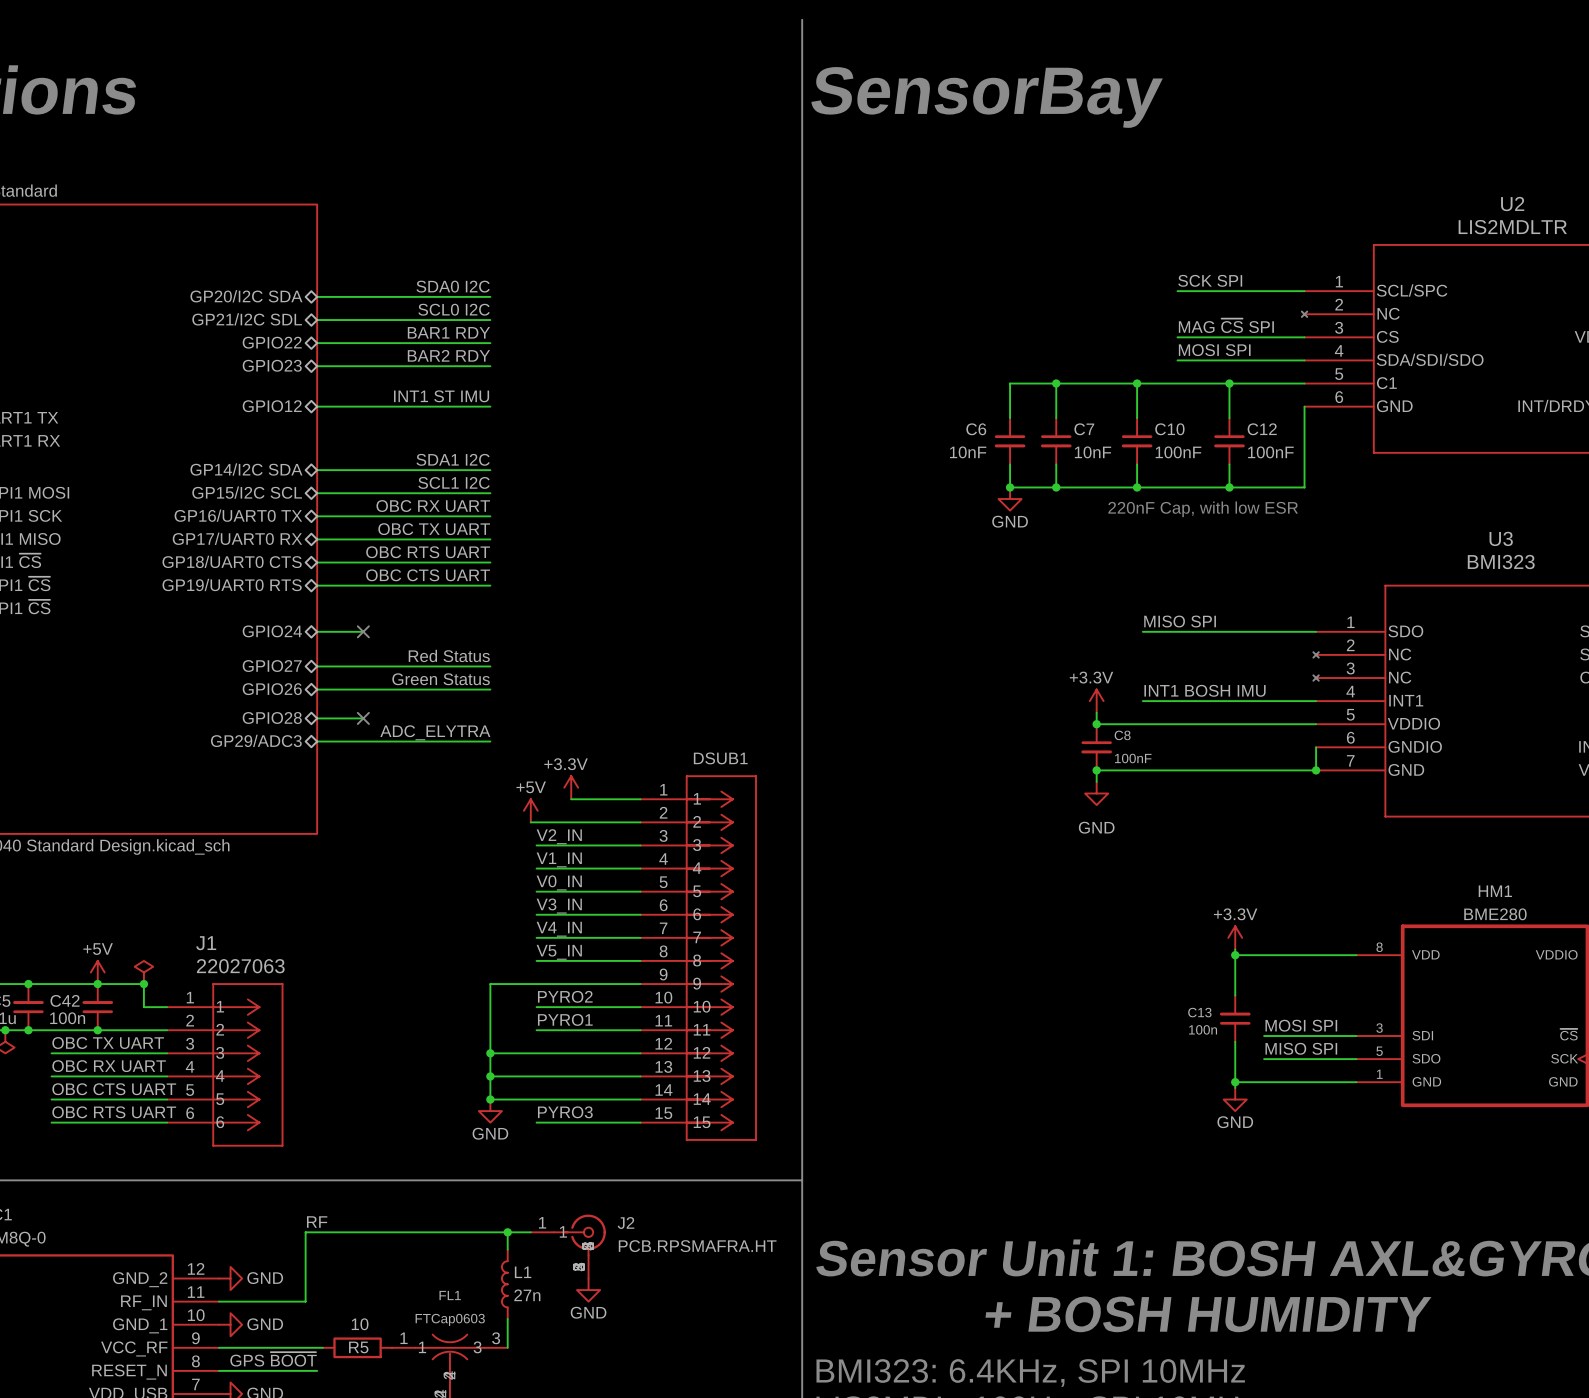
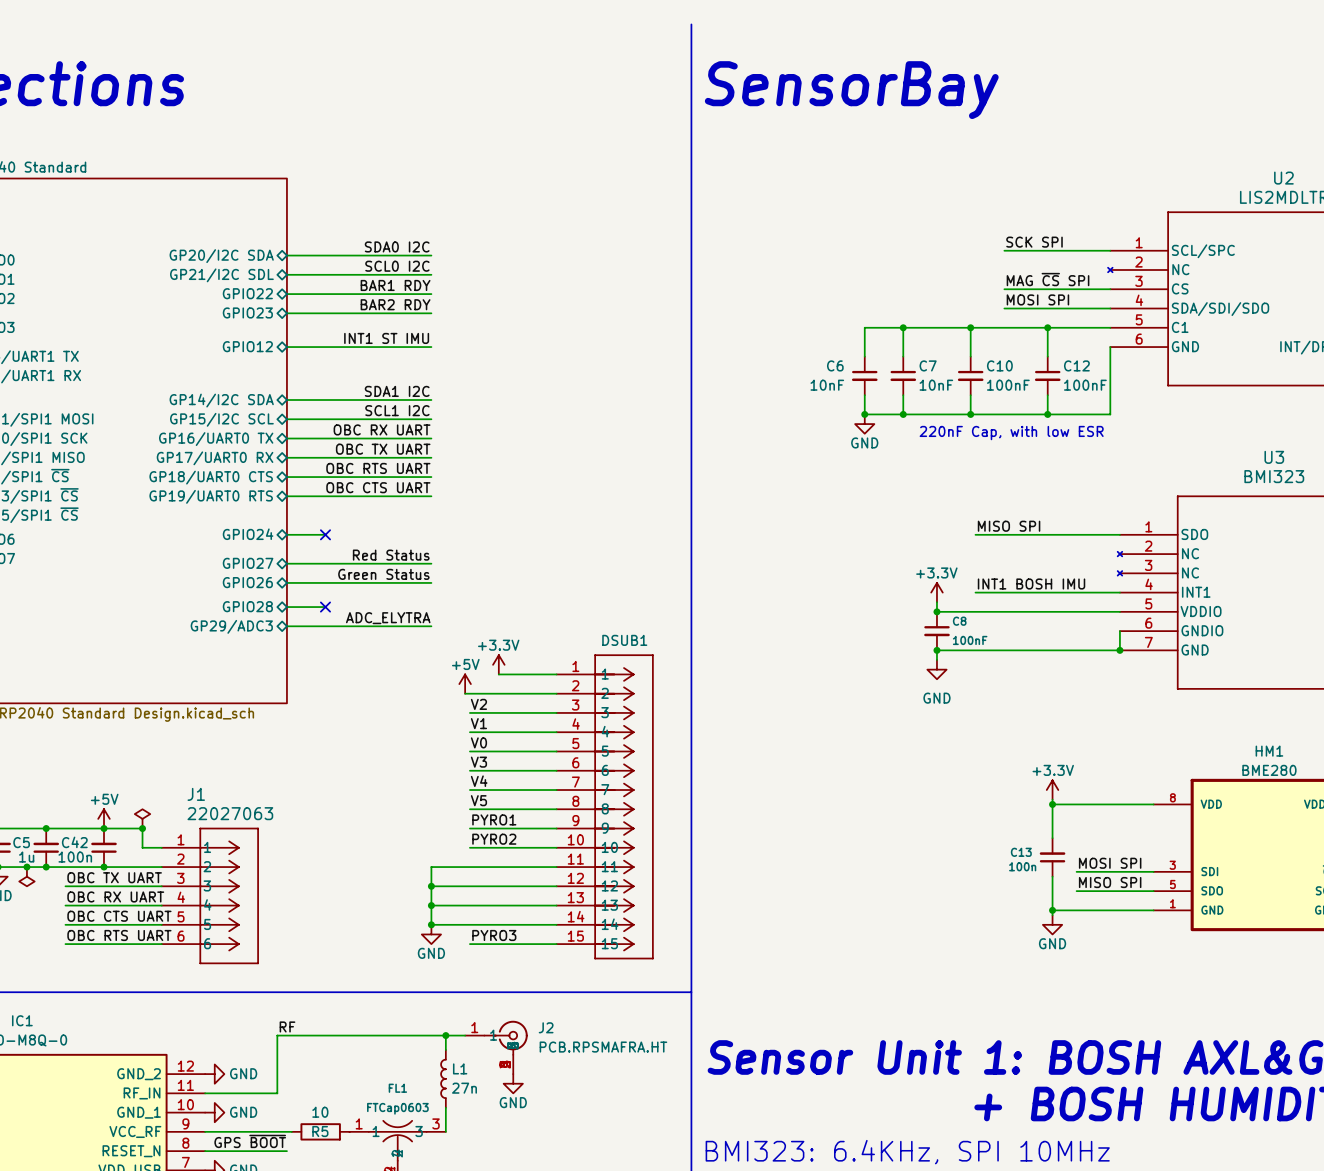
label: V2_IN (559, 836) -> V2 (478, 704)
label: V1_IN (559, 859) -> V1 (478, 723)
label: V0_IN (559, 882) -> V0 (478, 742)
label: V3_IN (559, 906) -> V3 (478, 762)
label: V4_IN (559, 929) -> V4 (479, 781)
label: V5_IN (559, 952) -> V5 (478, 800)
wire: (536, 984) (490, 984) (490, 1030) -> (469, 867) (431, 867)
label position: PYRO1 (565, 1019) -> PYRO1 (494, 819)

